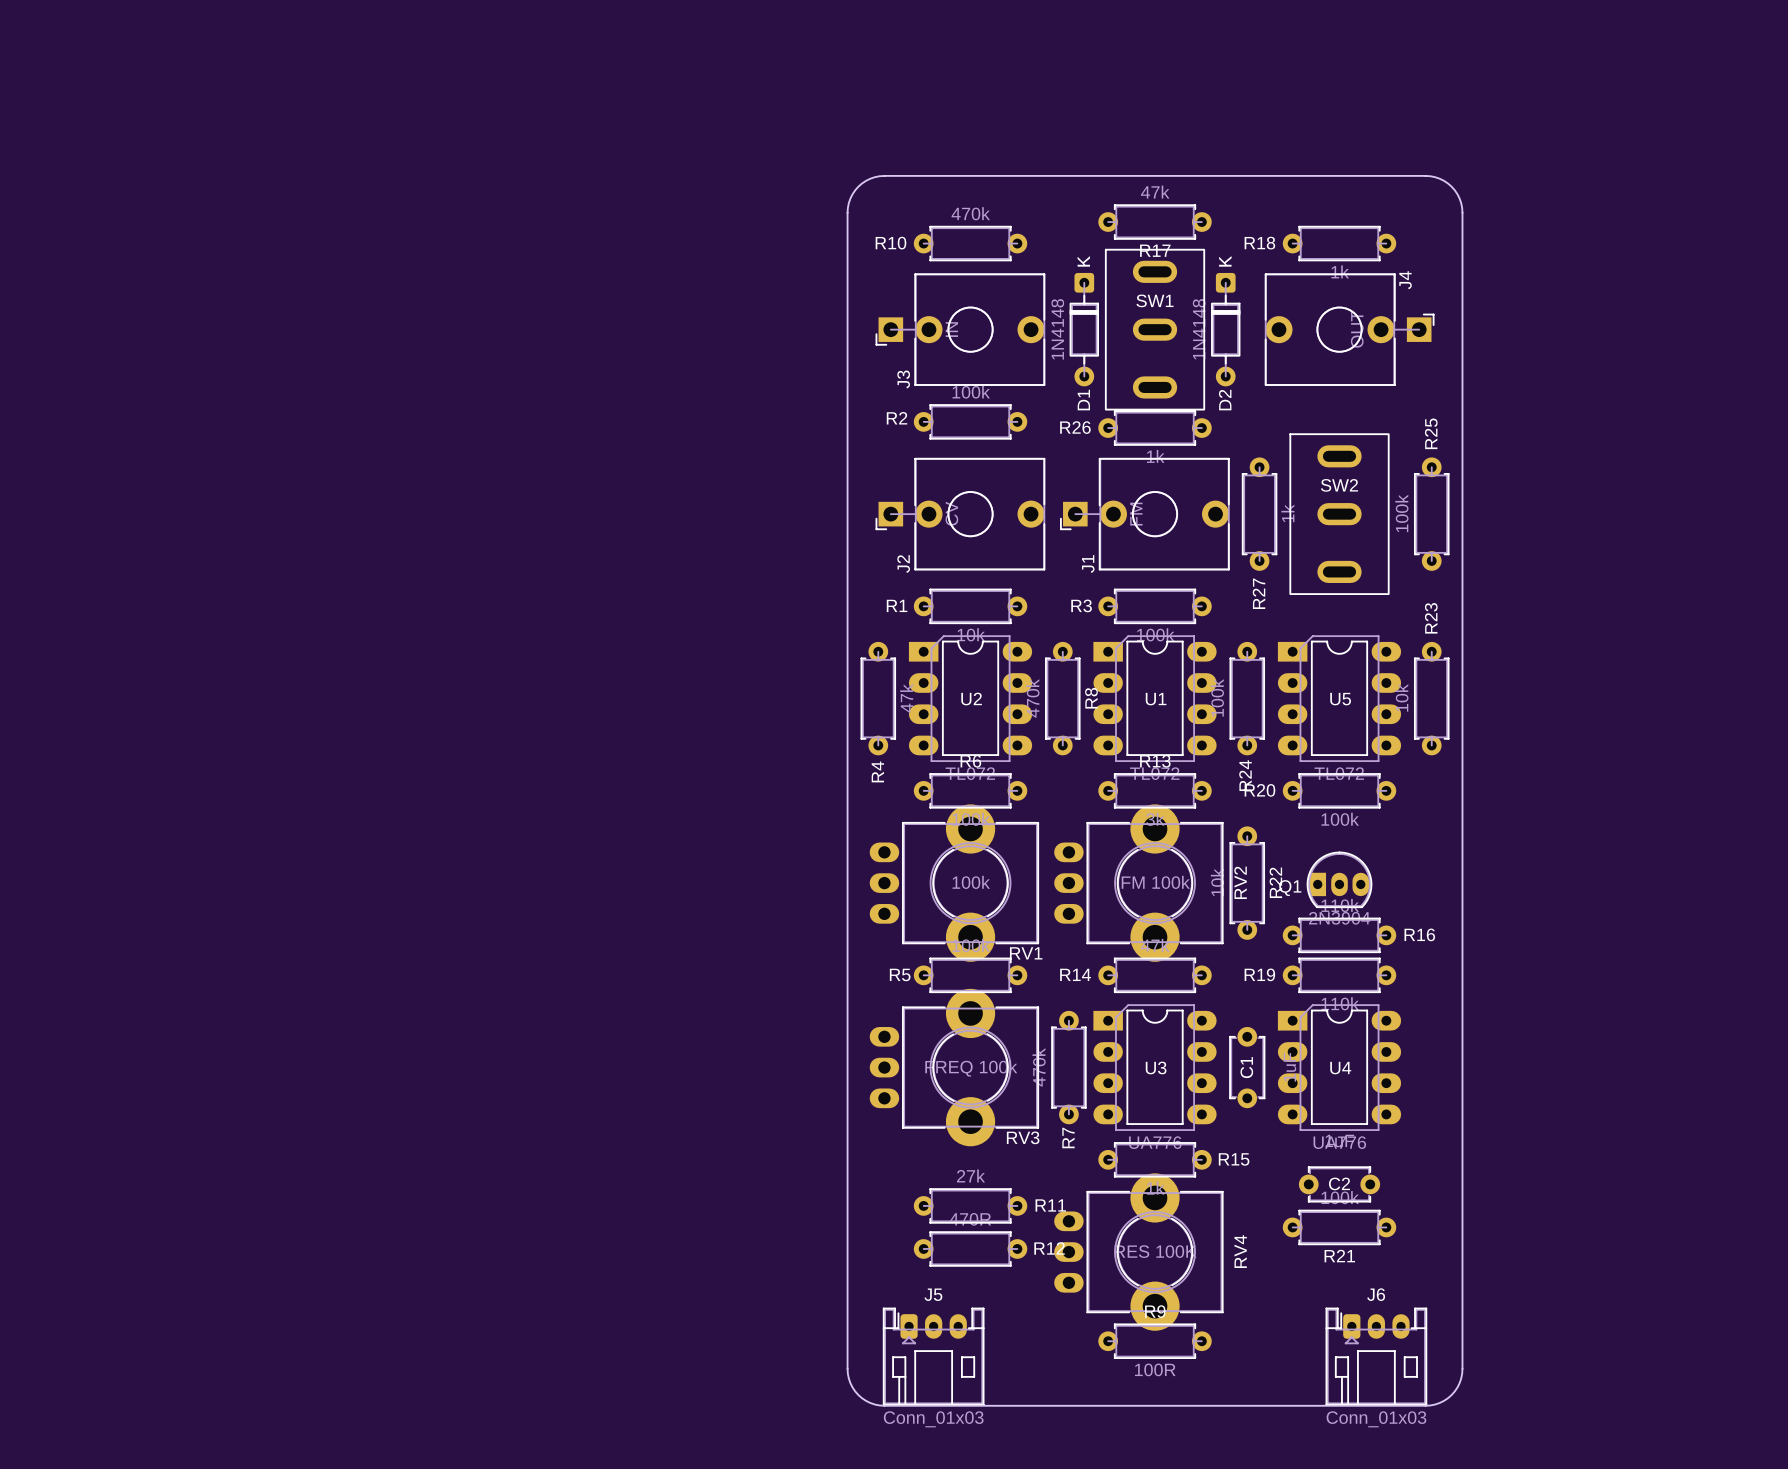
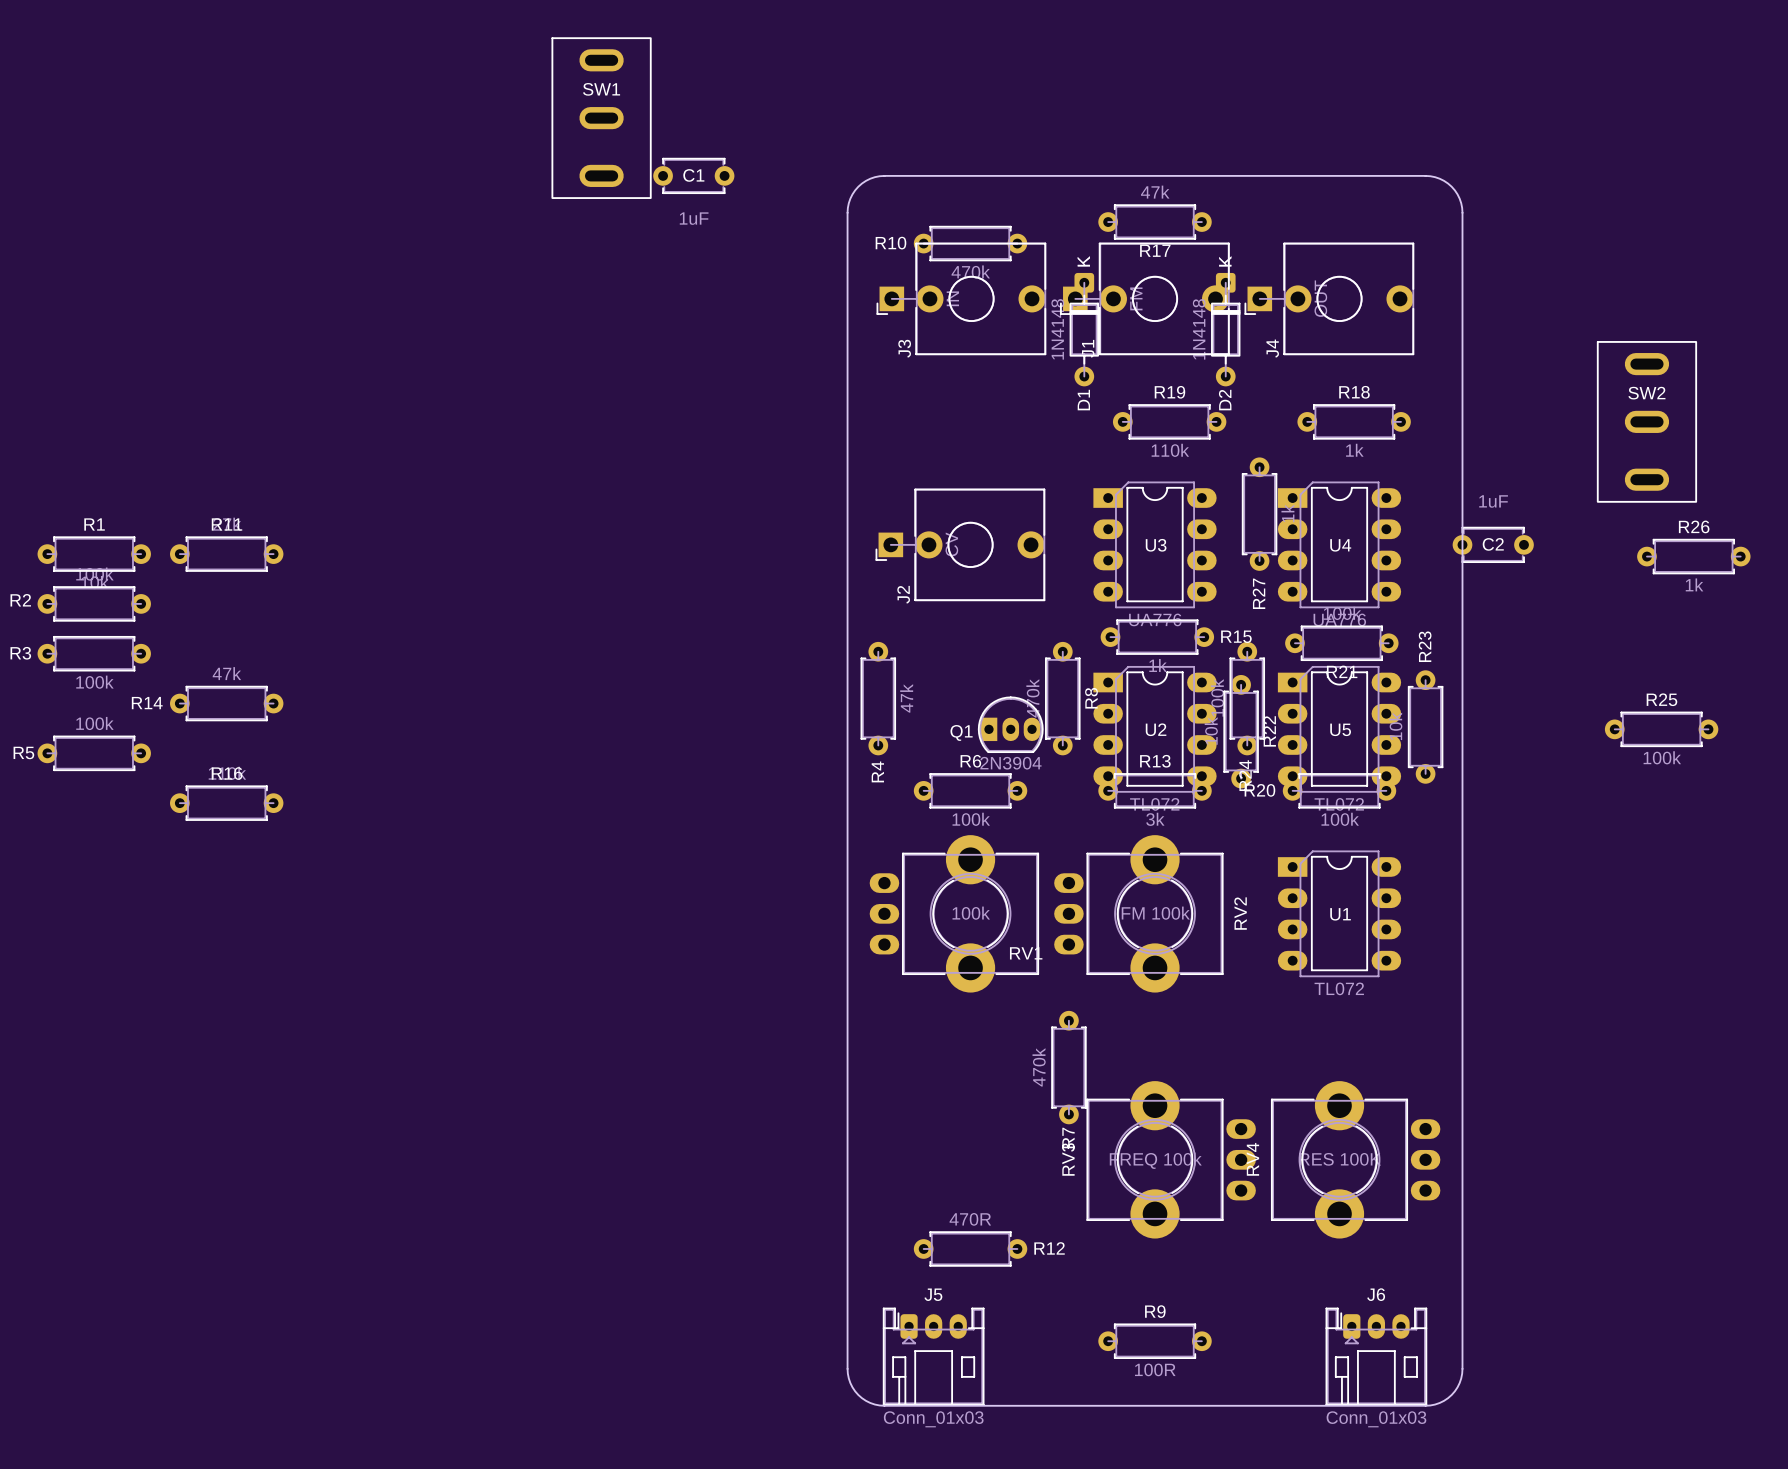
R10 value position: 470k (970, 213) -> 470k (970, 272)
R18 name position: R18 (1259, 243) -> R18 (1354, 392)
R18 position: (1339, 243) -> (1354, 421)
J3 position: (960, 329) -> (961, 298)
SW1 position: (1155, 329) -> (601, 118)
J4 rotation: 0° (1349, 329) -> 180° (1329, 298)
R2 position: (970, 421) -> (94, 603)
R26 name position: R26 (1075, 427) -> R26 (1694, 526)
R26 position: (1155, 428) -> (1693, 556)
R25 name position: R25 (1431, 433) -> R25 (1661, 699)
R25 value position: 100k (1401, 513) -> 100k (1662, 757)
J2 position: (960, 514) -> (960, 544)
J1 position: (1144, 514) -> (1144, 298)
SW2 position: (1339, 514) -> (1646, 421)
R25 rotation: 0° (1431, 514) -> 90° clockwise (1661, 729)
R25 position: (1431, 514) -> (1661, 729)
R1 name position: R1 (897, 605) -> R1 (94, 524)
R1 position: (970, 606) -> (94, 554)
R3 position: (1155, 606) -> (94, 653)
U2 position: (970, 698) -> (1155, 729)
U1 position: (1155, 698) -> (1339, 913)
U5 position: (1339, 698) -> (1339, 729)
R23 position: (1431, 698) -> (1425, 727)
Q1 position: (1339, 879) -> (1010, 724)
RV1 position: (954, 883) -> (954, 913)
RV2 position: (1138, 883) -> (1138, 913)
R22 position: (1247, 883) -> (1241, 731)
R16 name position: R16 (1419, 934) -> R16 (227, 773)
R16 position: (1339, 935) -> (226, 803)
R19 name position: R19 (1259, 974) -> R19 (1169, 392)
R5 position: (970, 975) -> (94, 753)
R14 position: (1155, 975) -> (226, 703)
R19 position: (1339, 975) -> (1169, 421)
RV3 rotation: 0° (954, 1067) -> 180° (1171, 1159)
RV3 position: (954, 1067) -> (1171, 1159)
U3 position: (1155, 1067) -> (1155, 544)
C1 rotation: 0° (1247, 1067) -> 90° clockwise (693, 175)
C1 position: (1247, 1067) -> (693, 175)
U4 position: (1339, 1067) -> (1339, 544)
RV3 name position: RV3 (1023, 1137) -> RV3 (1068, 1159)
R15 position: (1155, 1159) -> (1157, 637)
C2 position: (1339, 1184) -> (1493, 544)
R11 position: (970, 1205) -> (226, 554)
R11 name position: R11 (1050, 1205) -> R11 (227, 524)
R21 position: (1339, 1227) -> (1341, 643)
RV4 rotation: 0° (1138, 1252) -> 180° (1355, 1159)
RV4 position: (1138, 1252) -> (1355, 1159)

